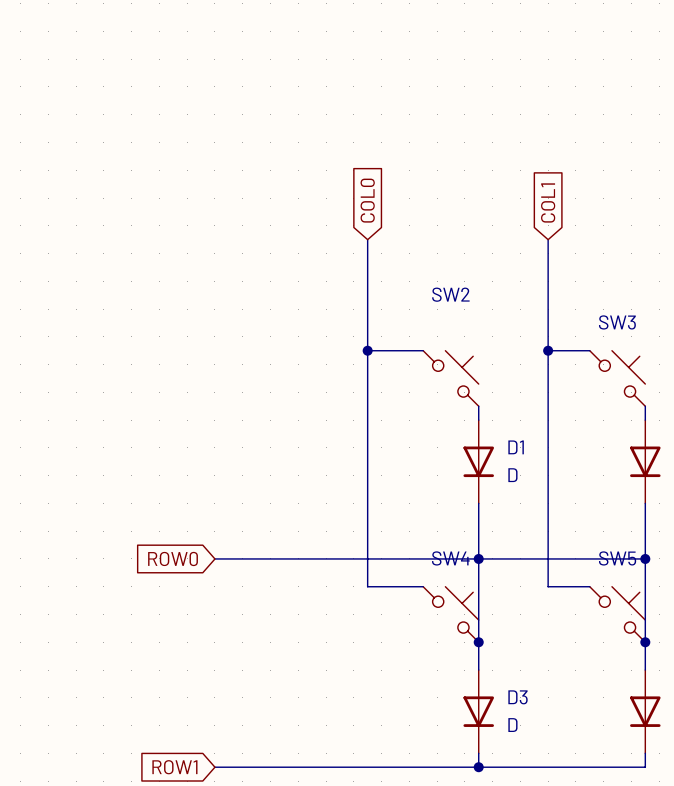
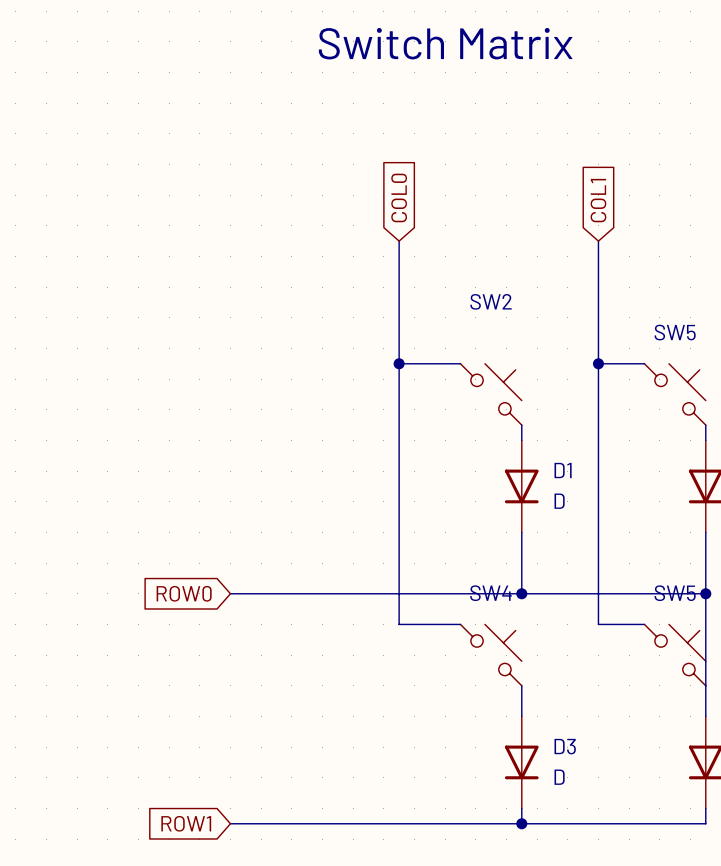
text: none -> Switch Matrix (445, 43)
SW3 name: SW3 (617, 322) -> SW5 (675, 332)
wire: (478, 558) (478, 642) -> none
junction: (478, 642) -> none
junction: (645, 642) -> none

